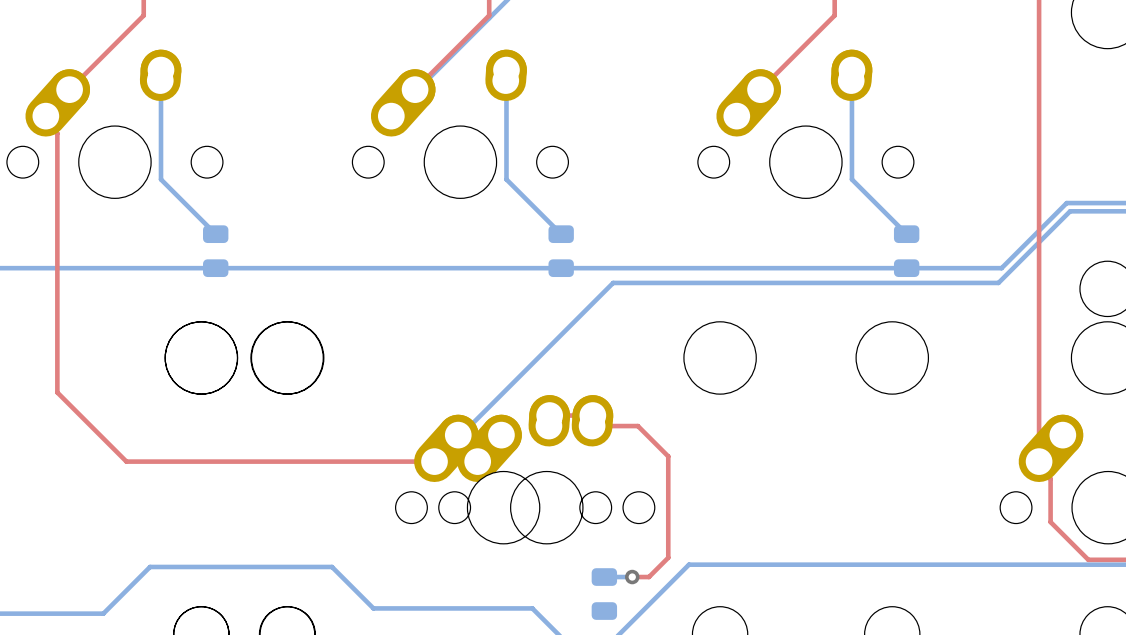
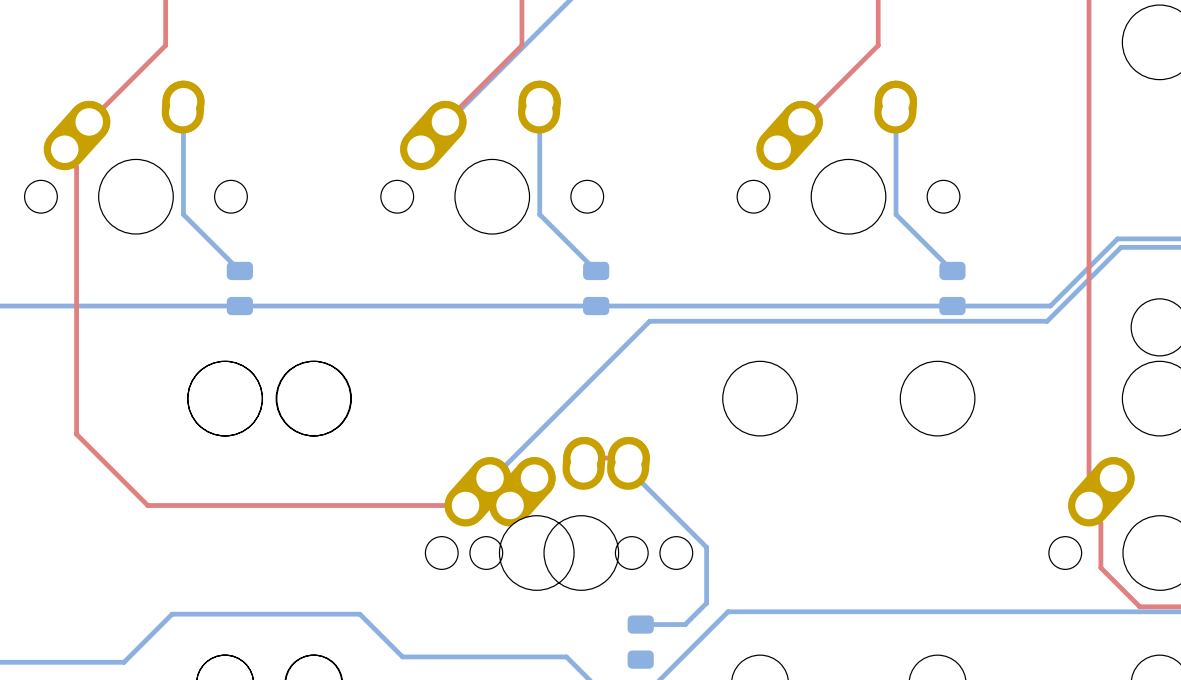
bottom track: none -> (628, 468) (706, 547) (706, 603) (685, 624) (669, 624)
top track: (592, 426) (637, 426) (668, 456) (668, 557) (649, 577) (632, 577) -> none
via: (632, 577) -> none

